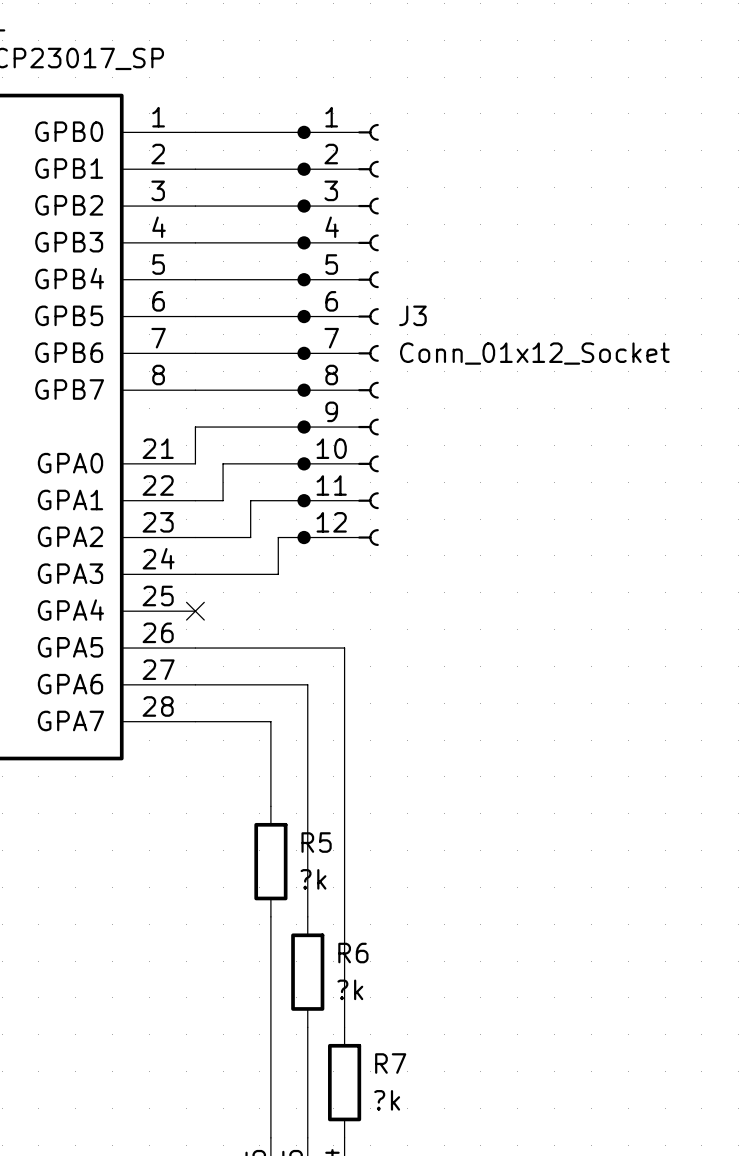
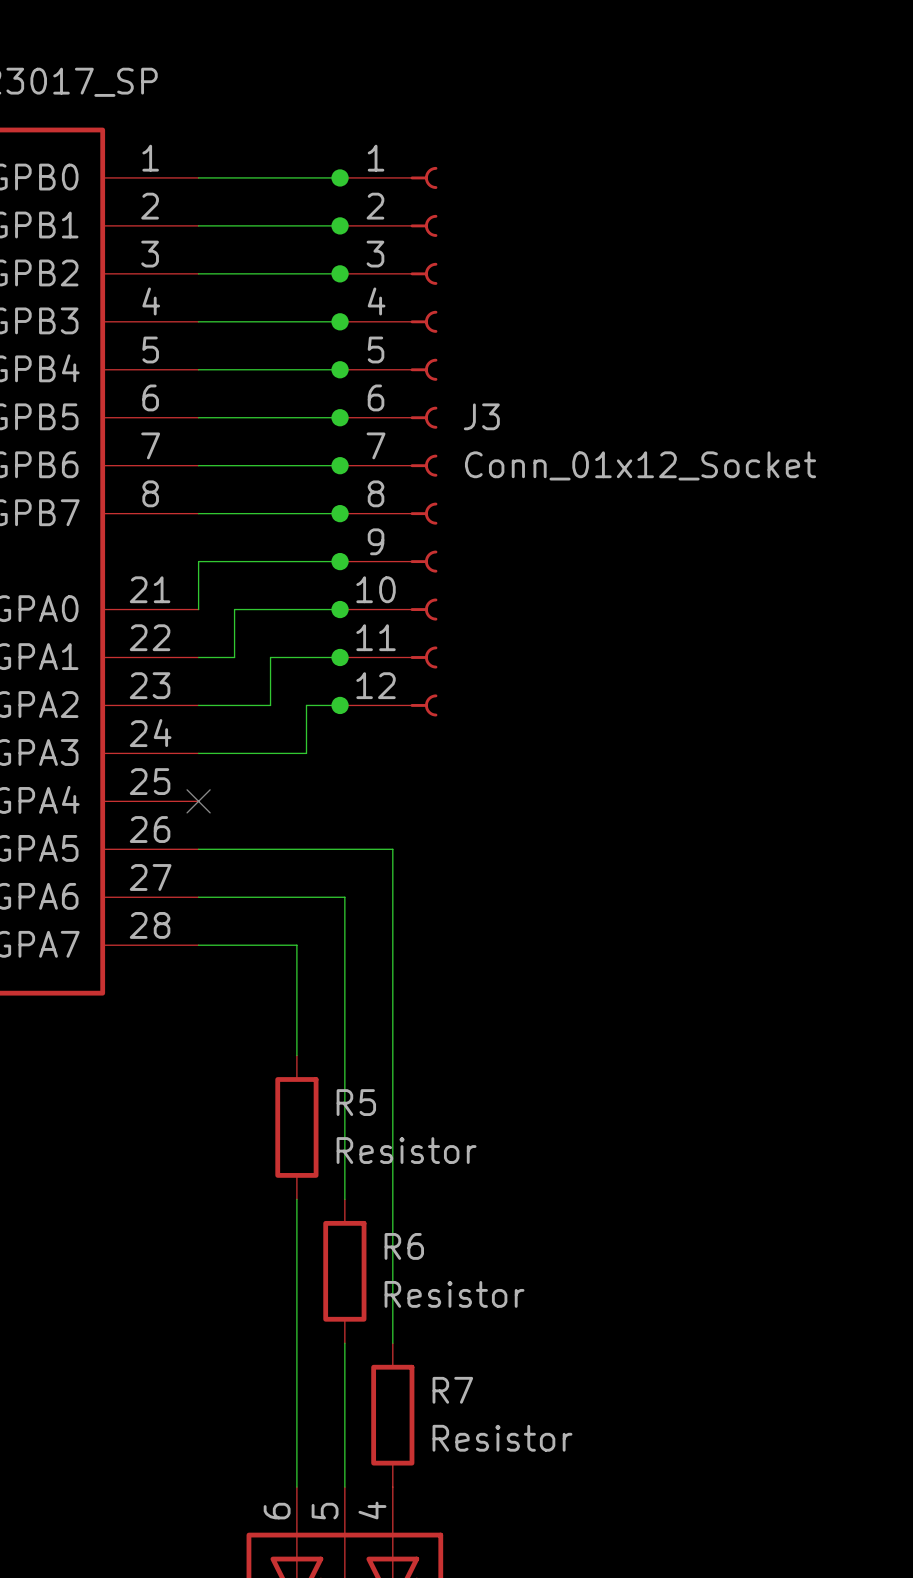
R5 value: ?k (313, 879) -> Resistor (406, 1150)
R6 value: ?k (350, 989) -> Resistor (454, 1294)
R7 value: ?k (387, 1100) -> Resistor (502, 1438)

